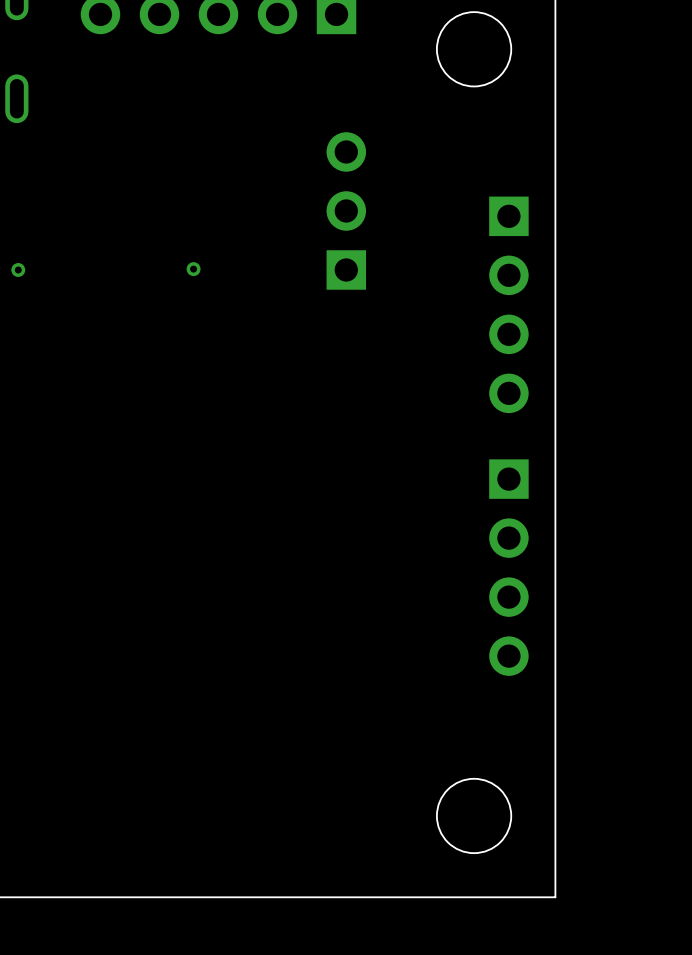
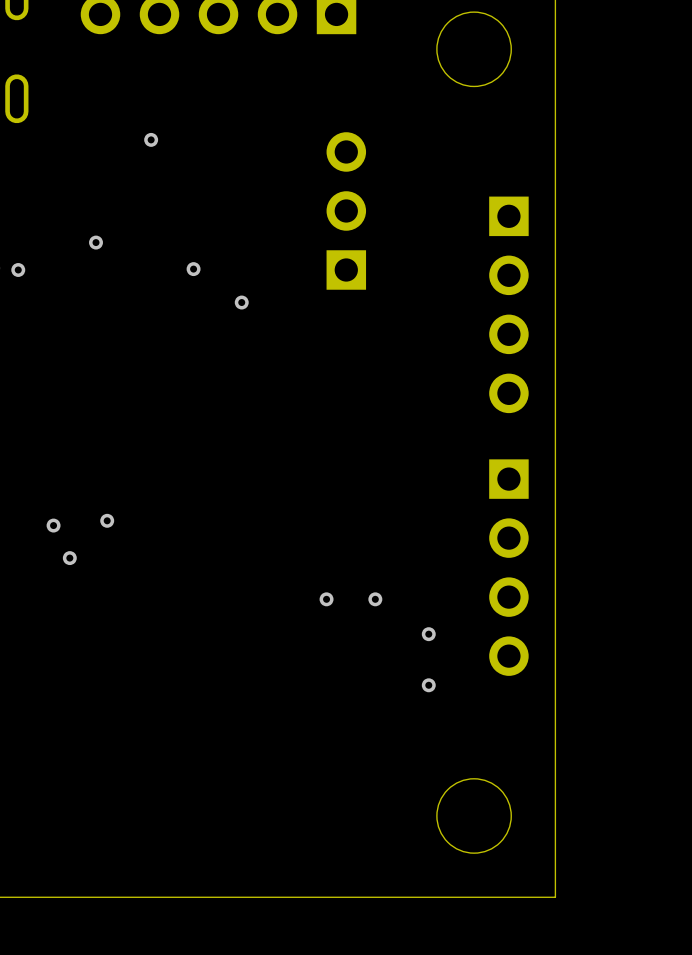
via: none -> (151, 139)
via: none -> (96, 242)
via: none -> (241, 302)
via: none -> (107, 520)
via: none -> (53, 525)
via: none -> (69, 558)
via: none -> (326, 599)
via: none -> (375, 599)
via: none -> (428, 634)
via: none -> (428, 685)

